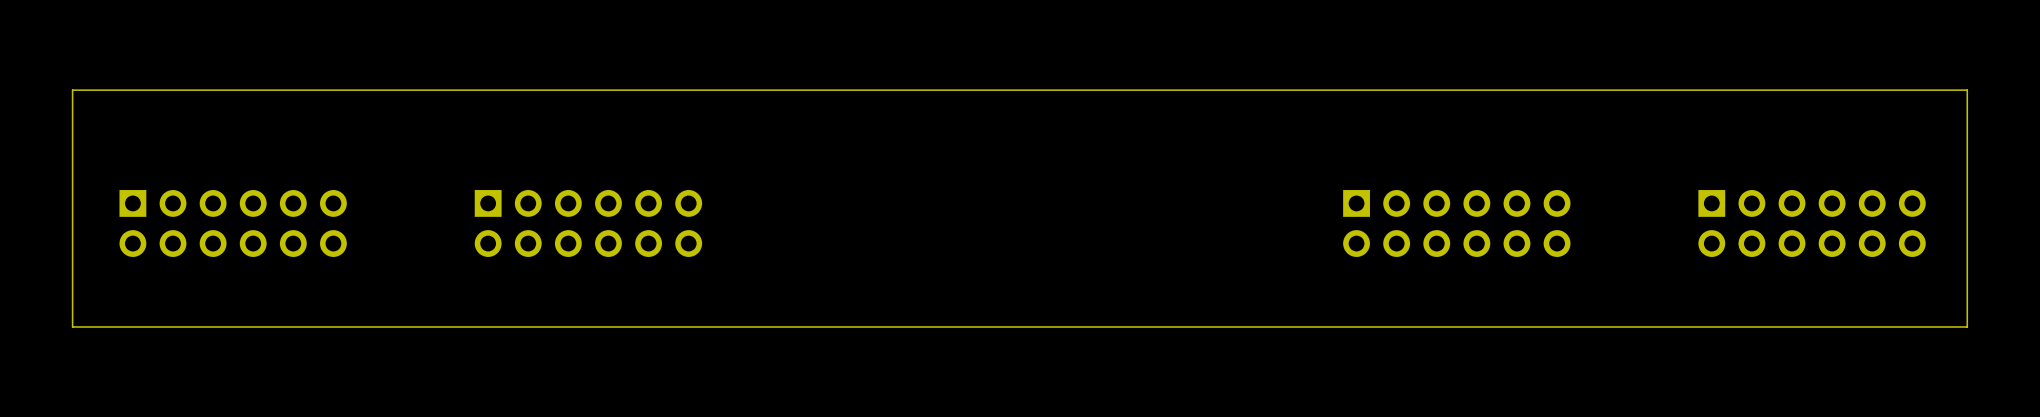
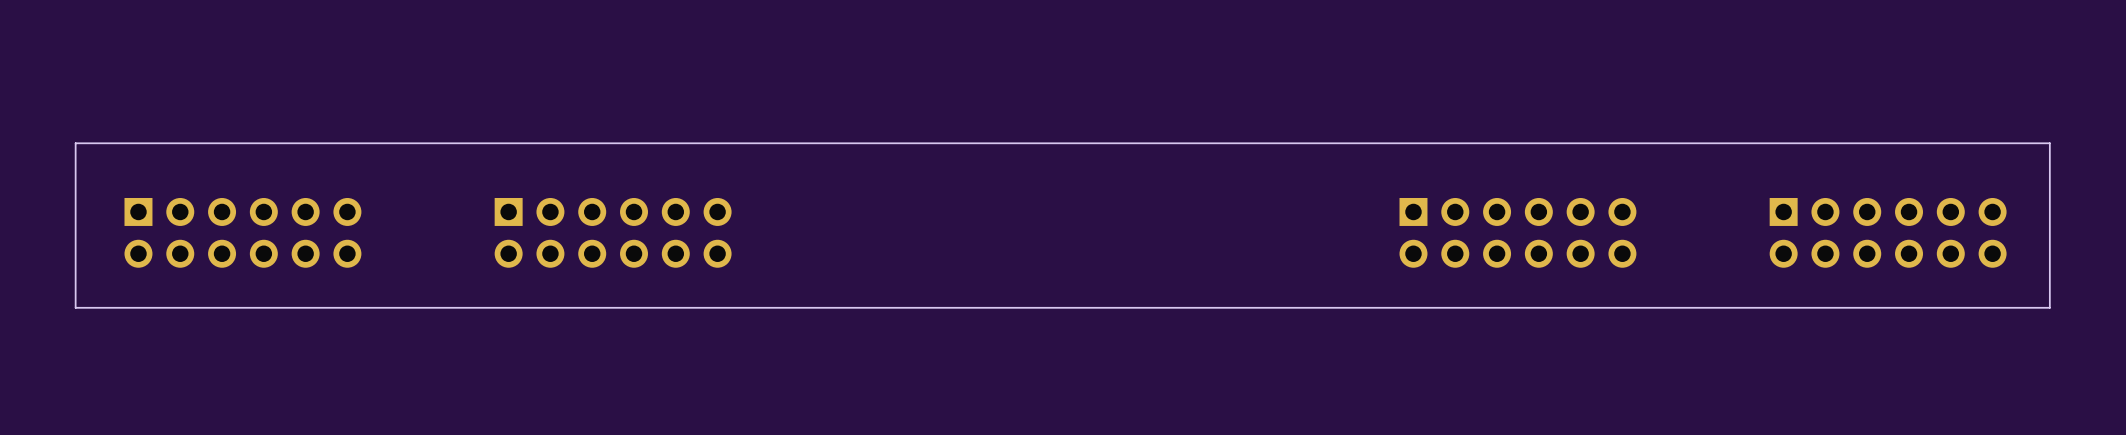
board edge: (1967, 137) (1967, 90) (72, 90) (72, 137) -> (2049, 143) (75, 143)
board edge: (1967, 295) (1967, 326) (72, 326) (72, 295) -> (2049, 307) (75, 307)

